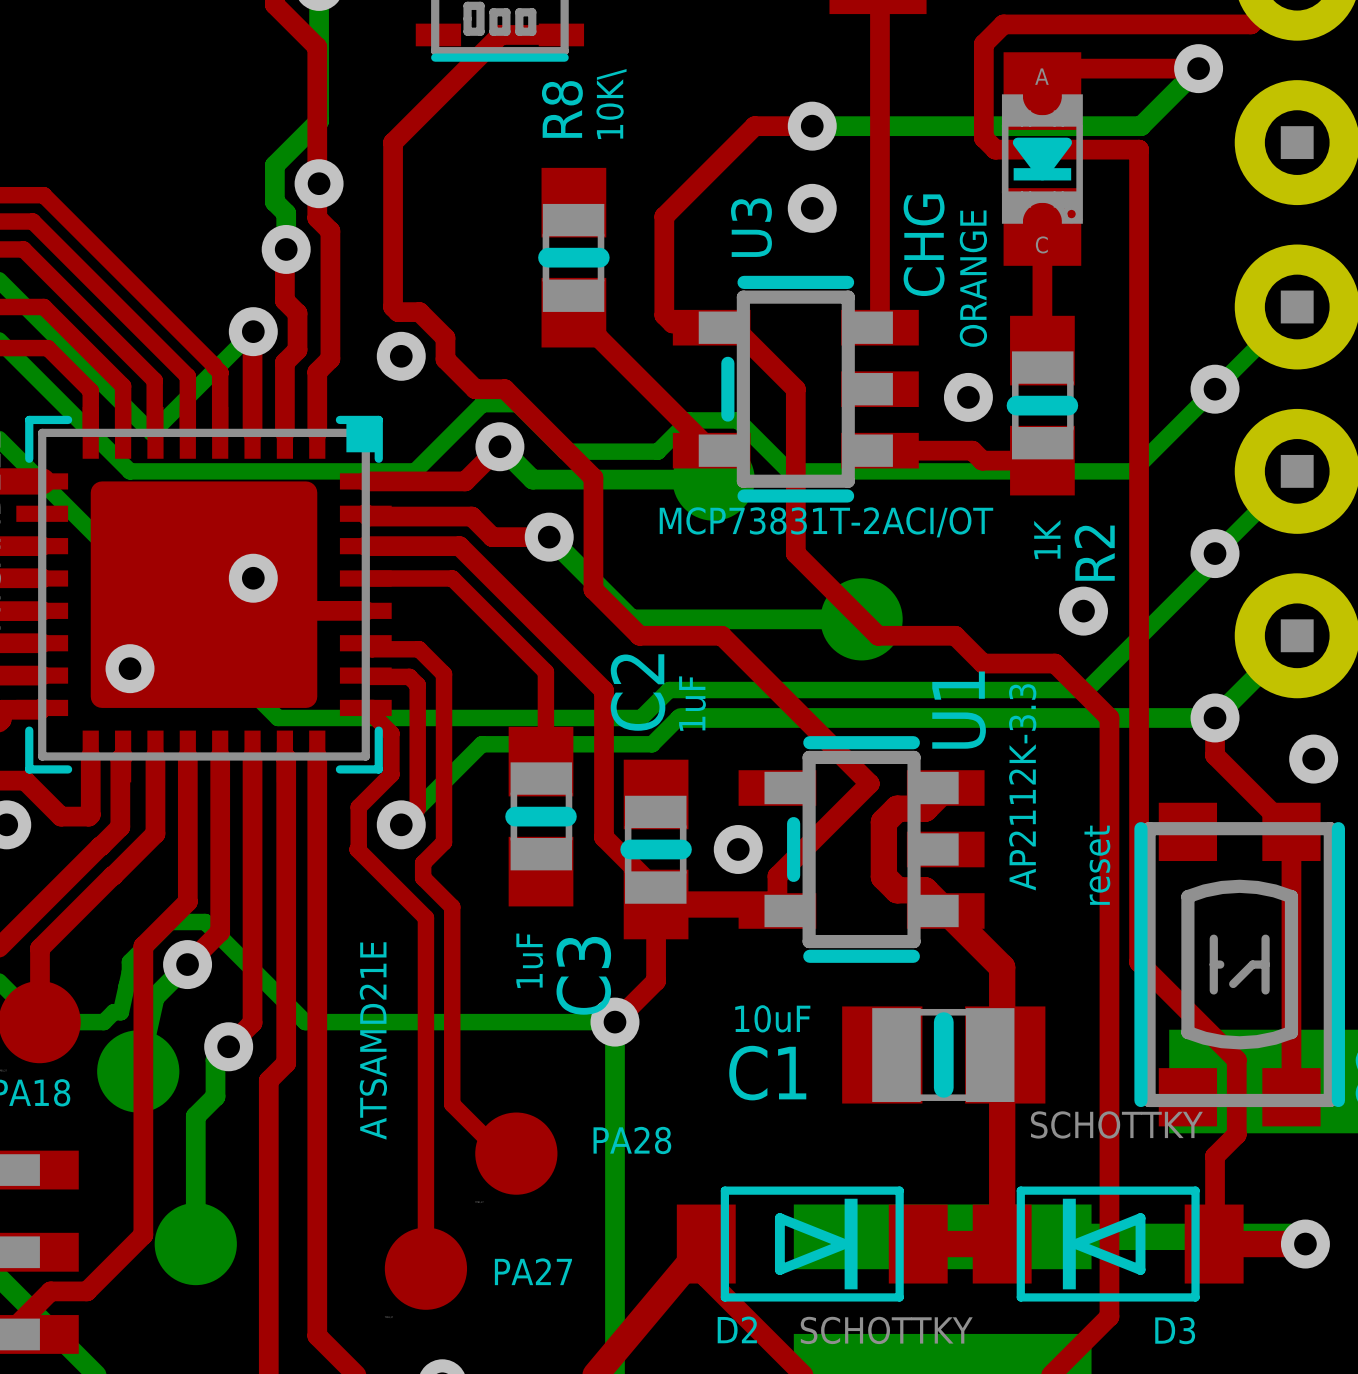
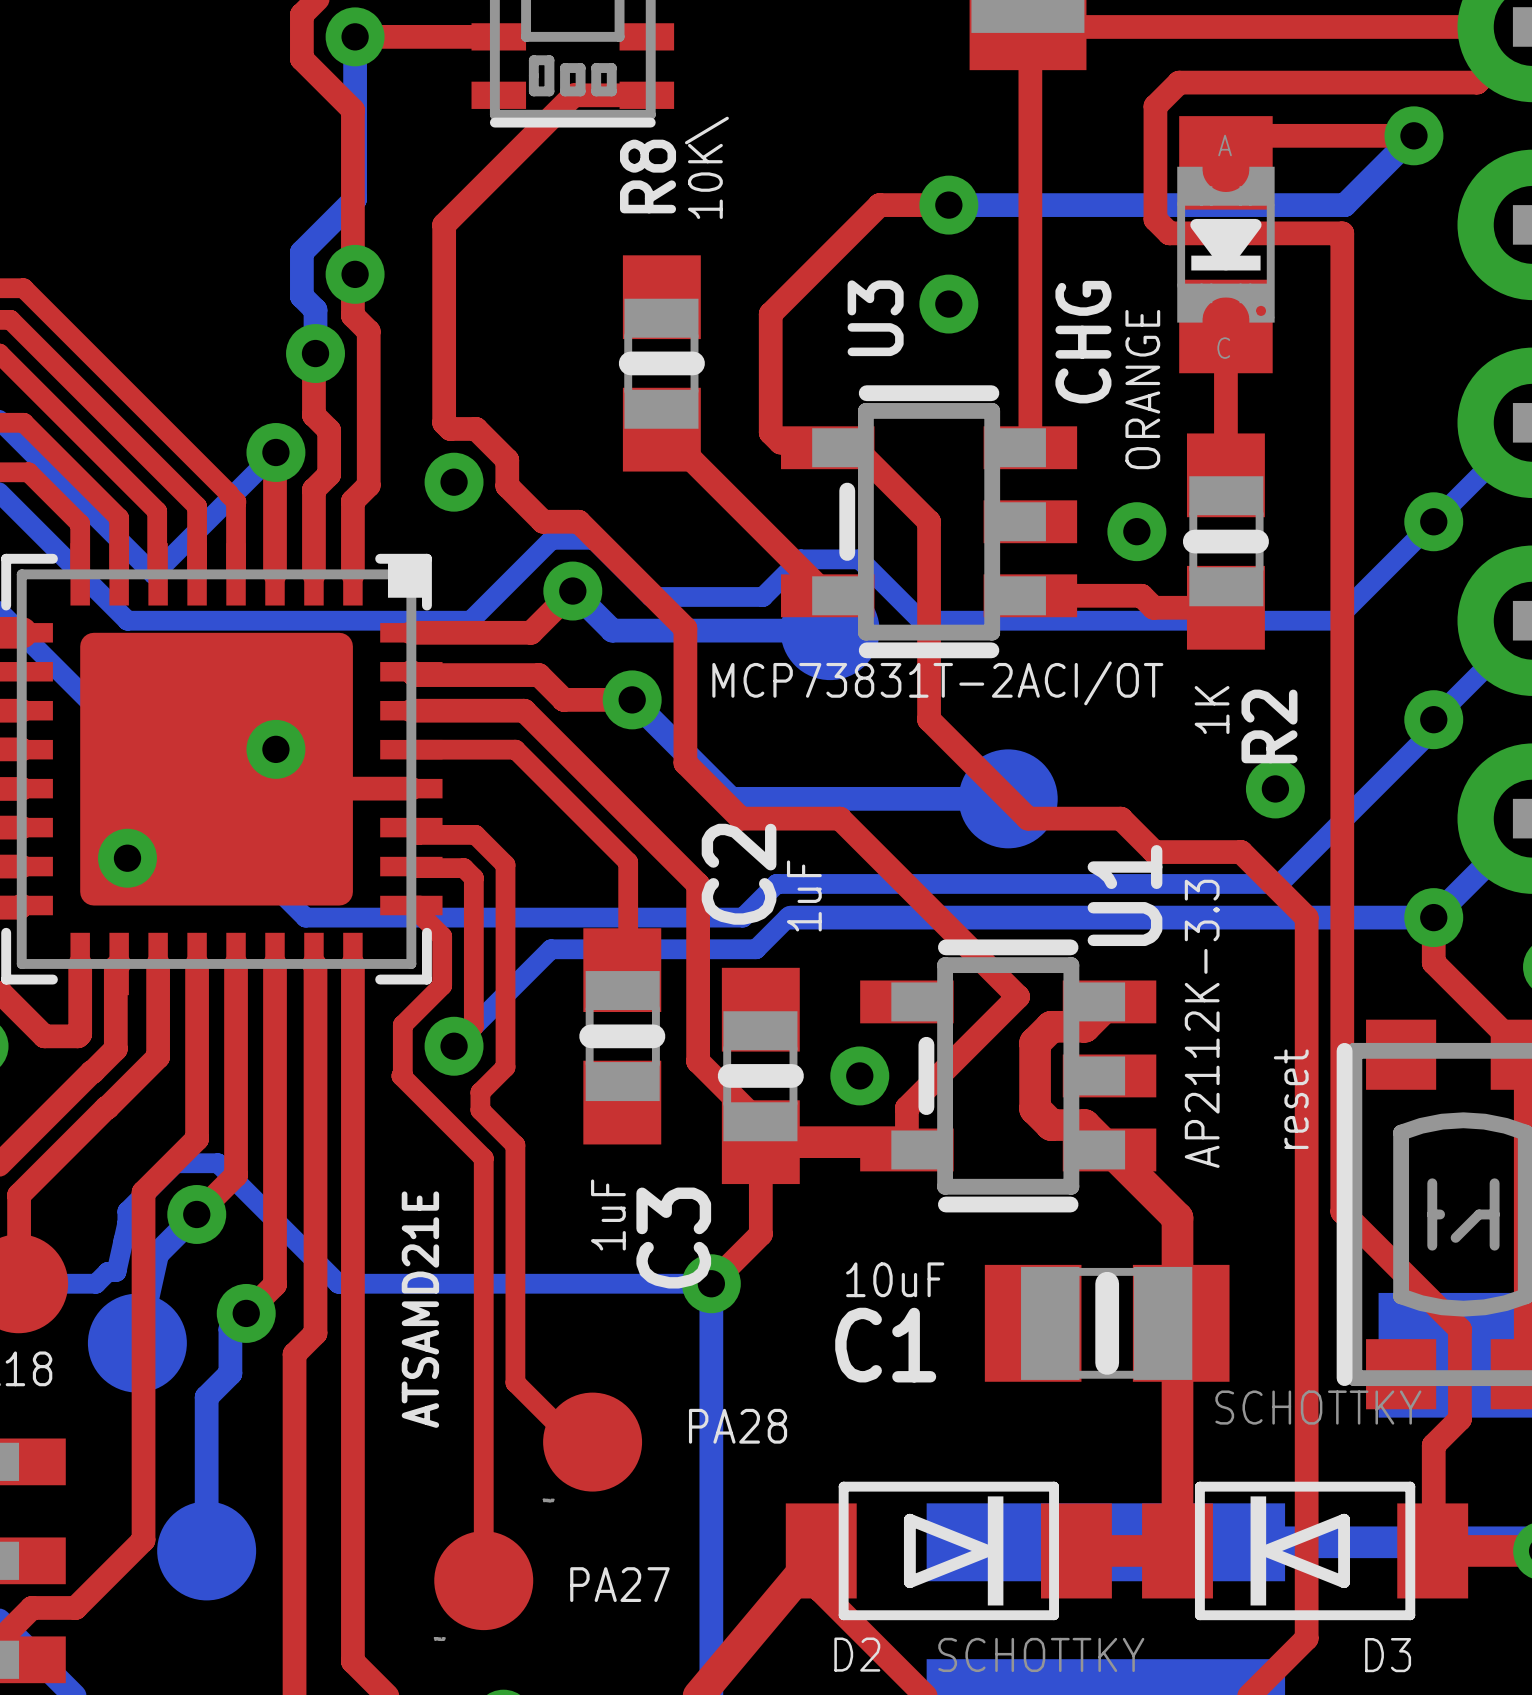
R2 value position: 1K (1047, 539) -> 1K (1212, 710)
R2 name position: R2 (1094, 553) -> R2 (1269, 726)

